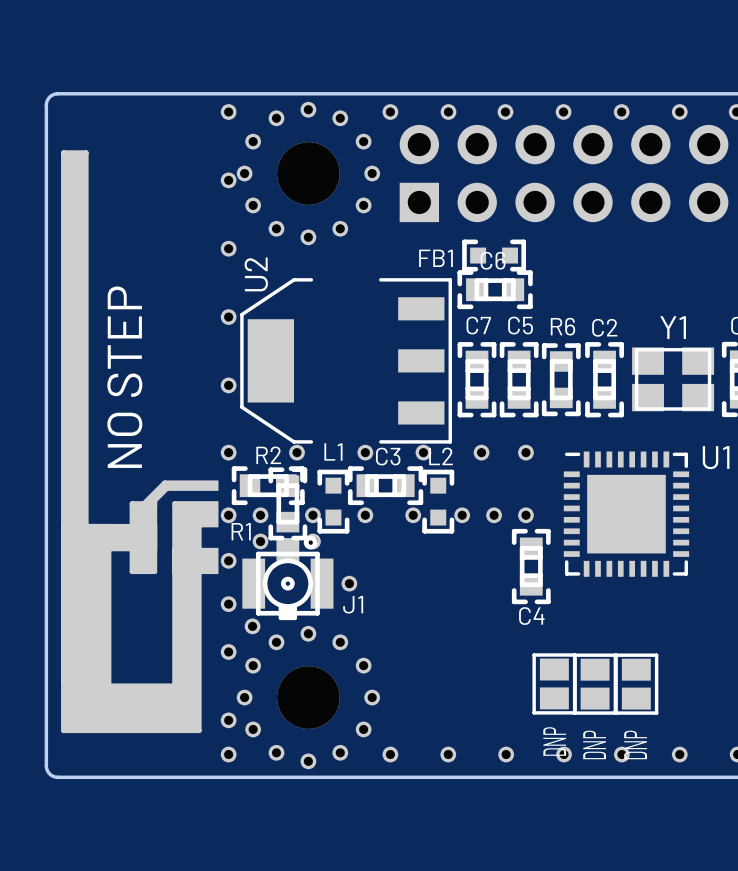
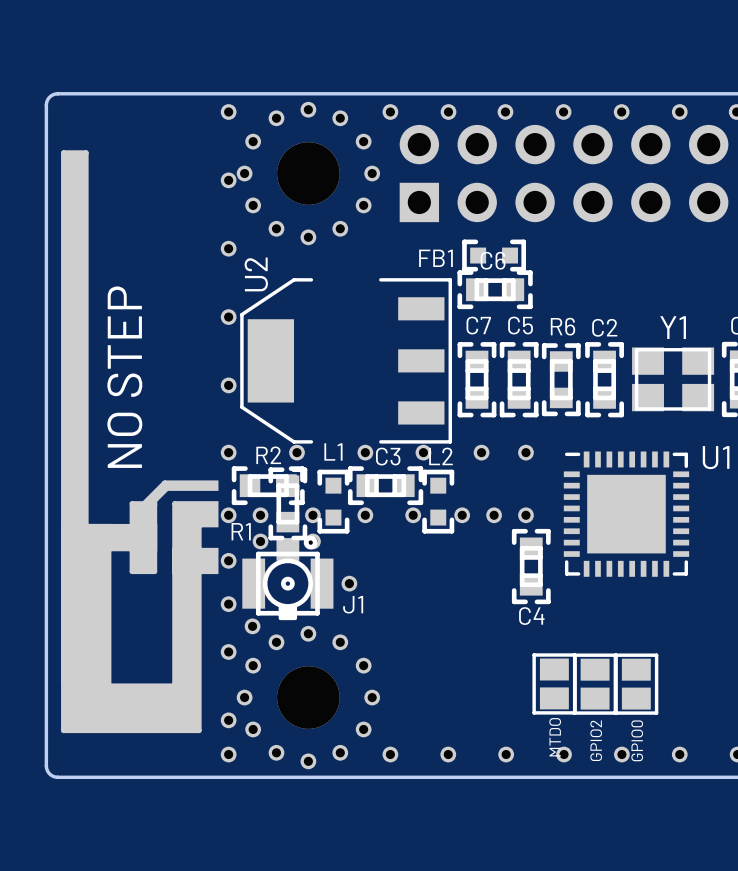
text: none -> MTDO (555, 737)
text: none -> GPIO2 (596, 740)
text: none -> GPIO0 (637, 740)
part value: DNP (554, 741) -> none
part value: DNP (594, 744) -> none
part value: DNP (635, 744) -> none

